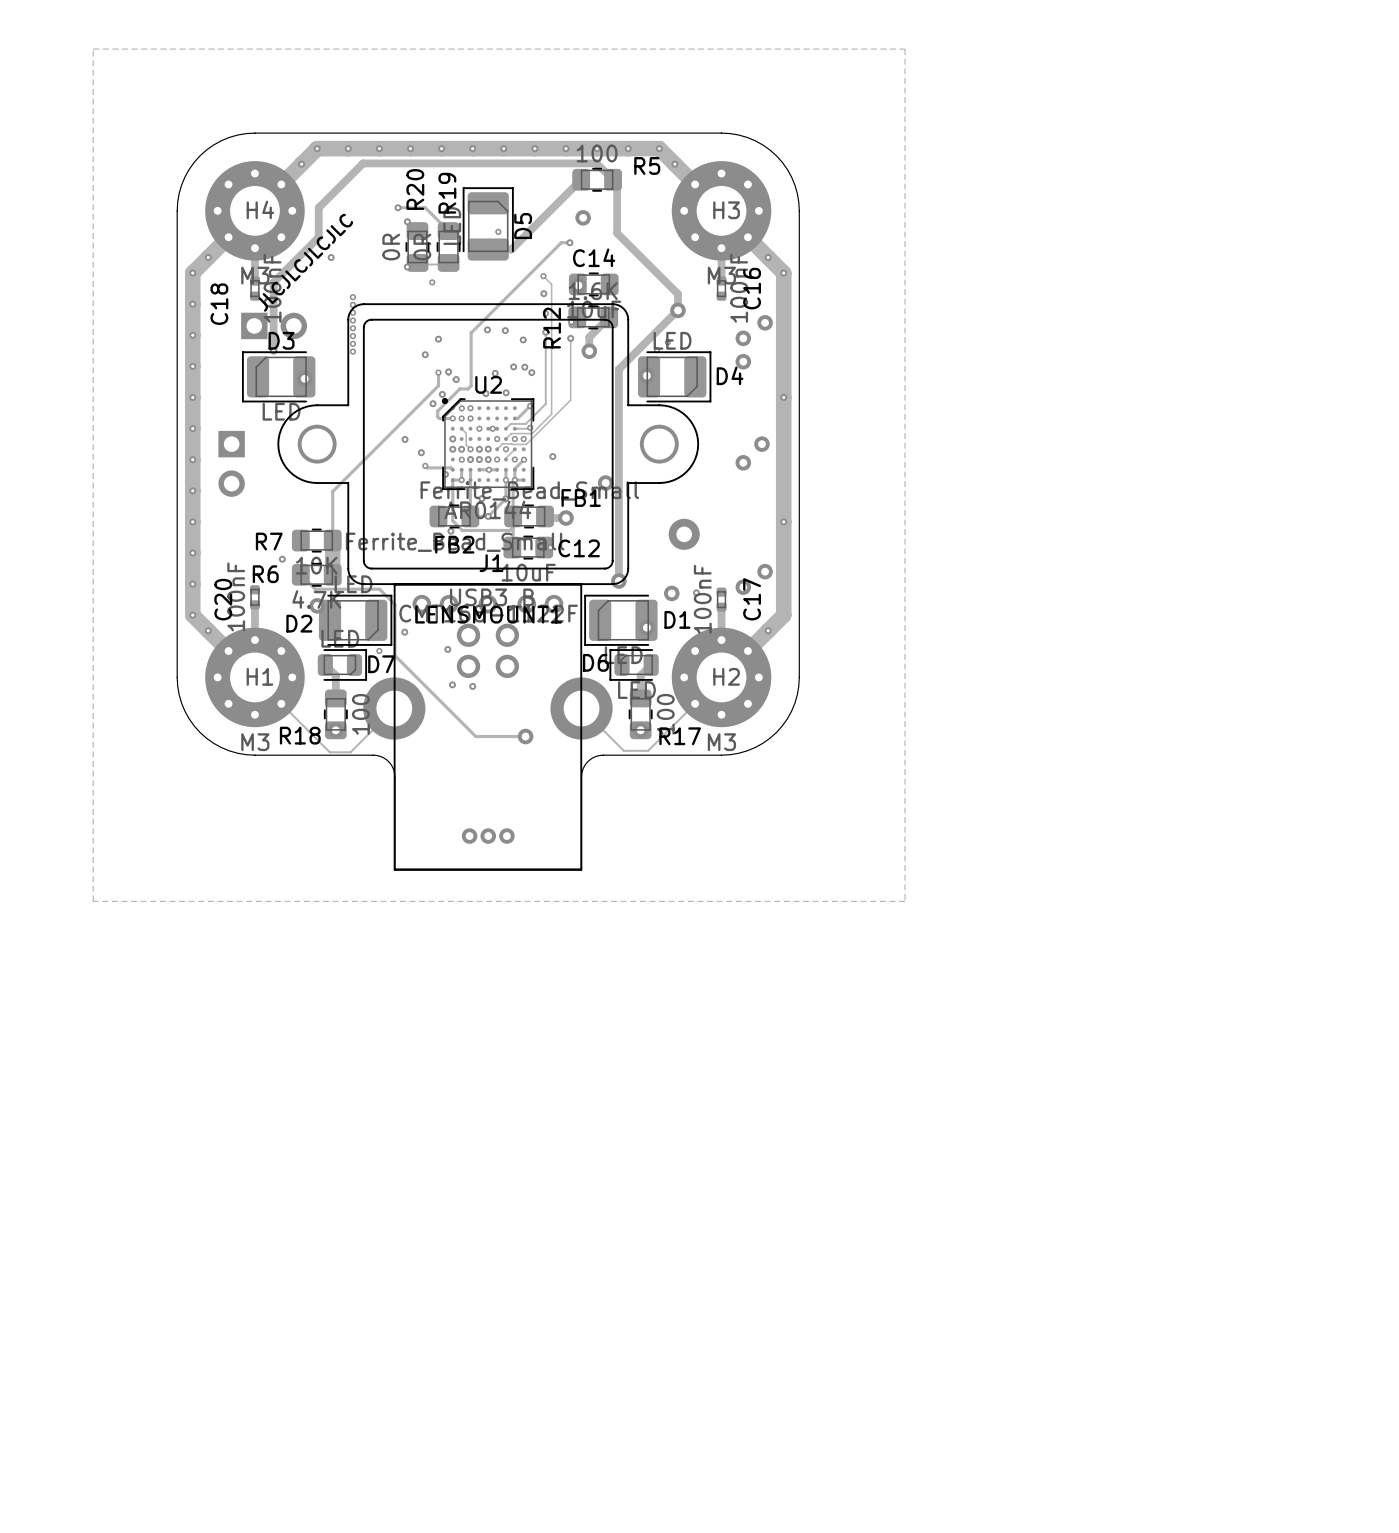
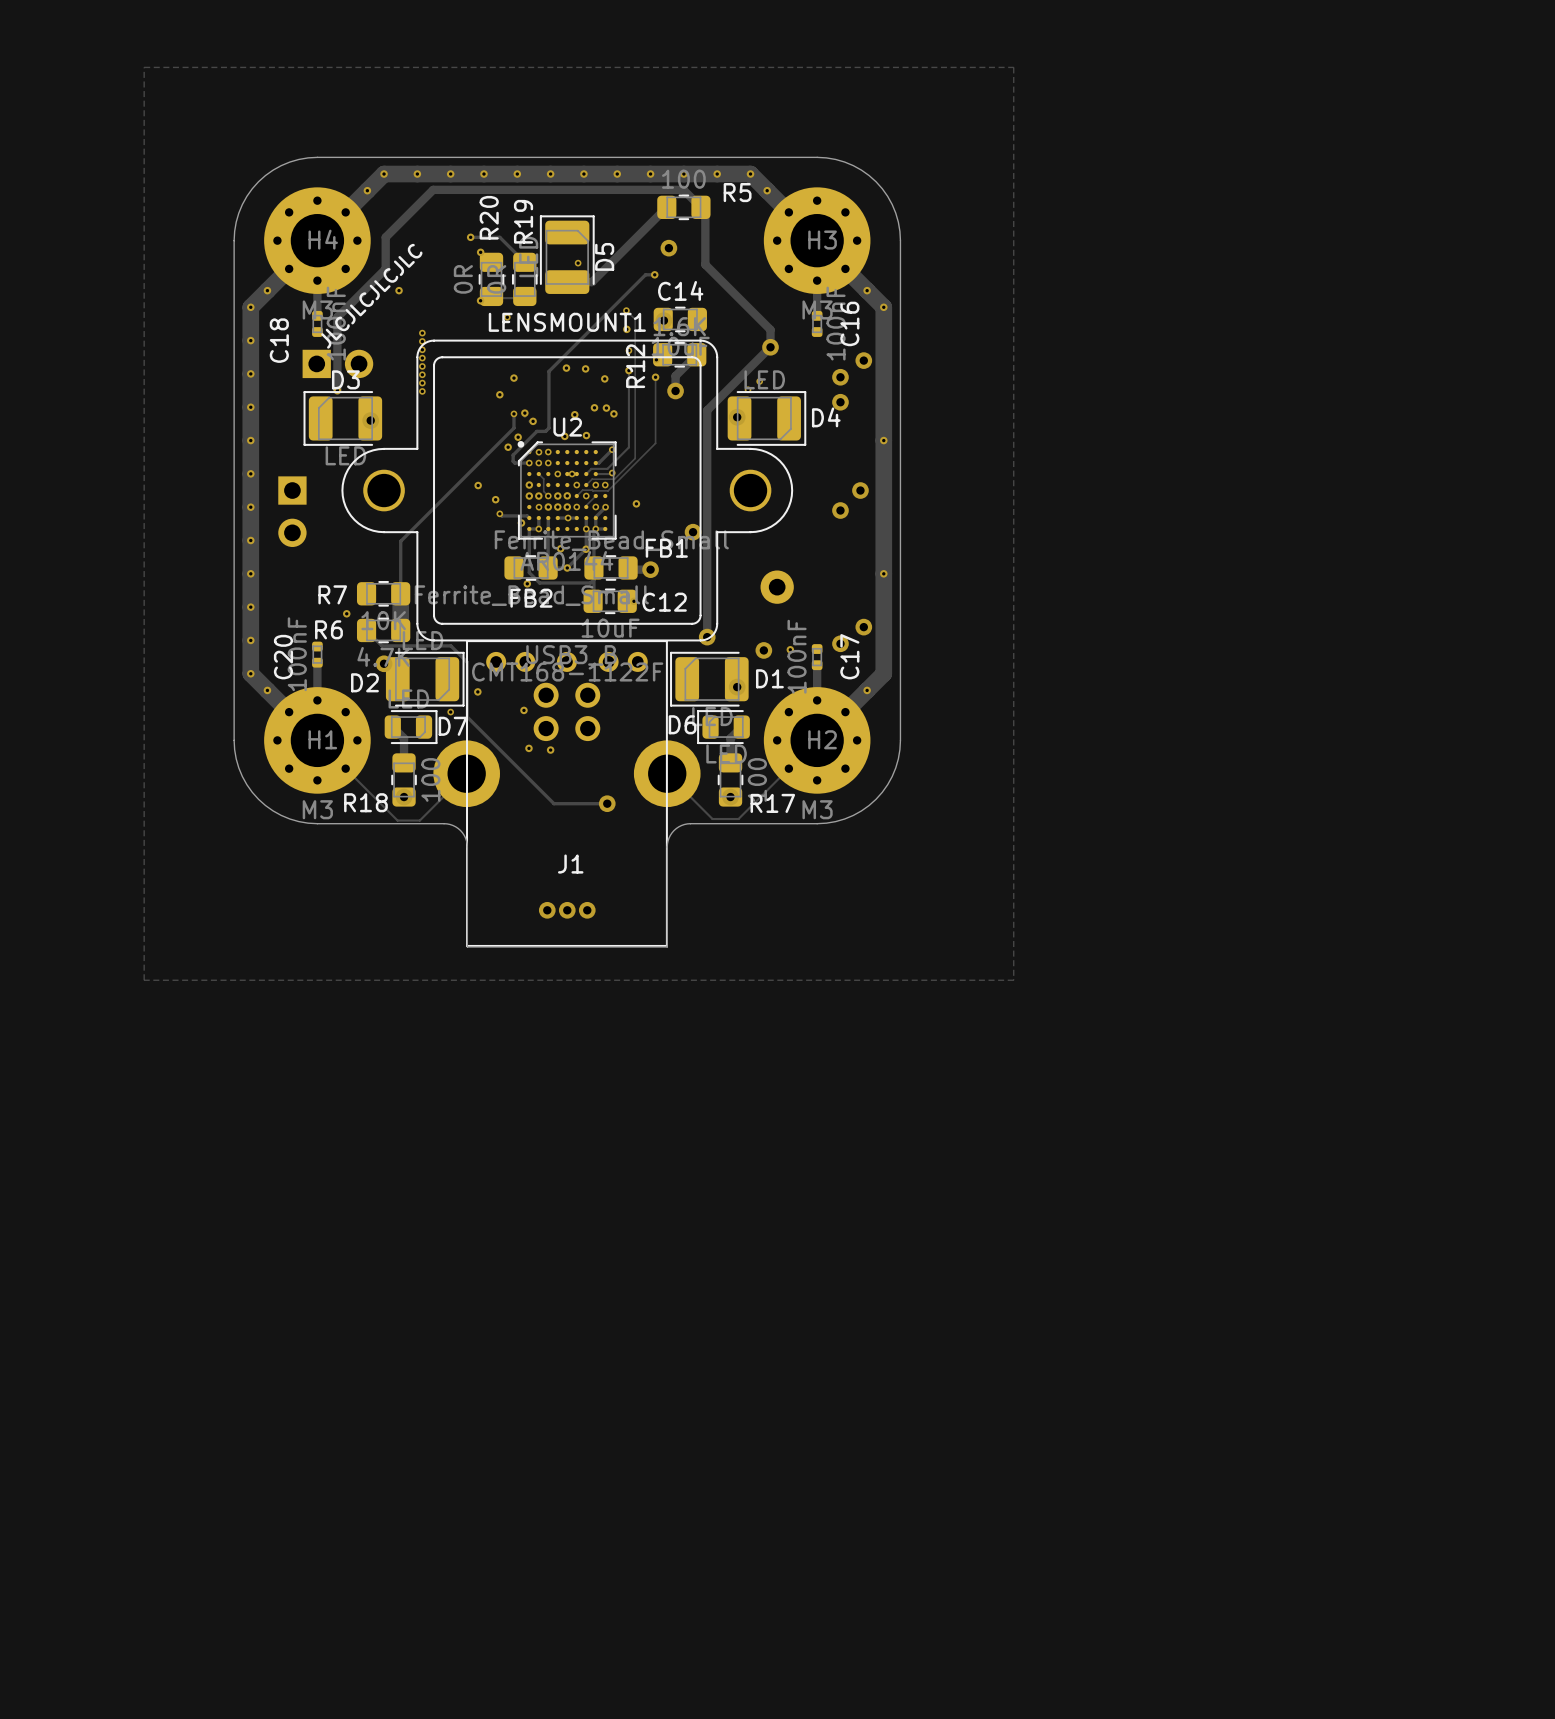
J1 name position: J1 (491, 563) -> J1 (570, 864)
LENSMOUNT1 name position: LENSMOUNT1 (488, 614) -> LENSMOUNT1 (567, 322)

